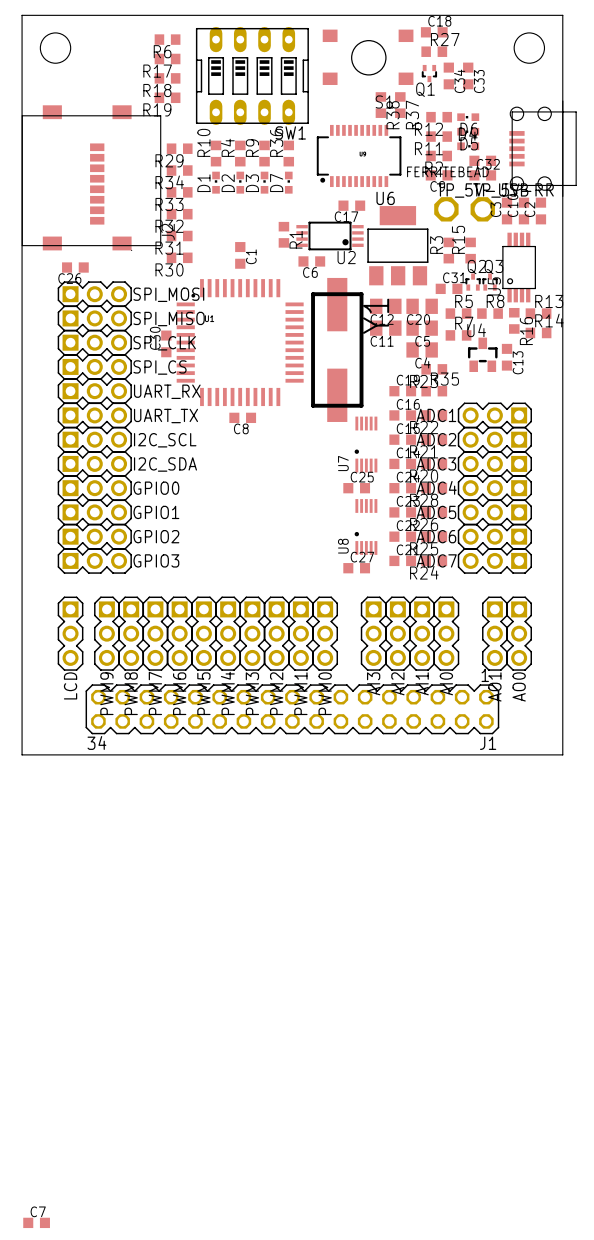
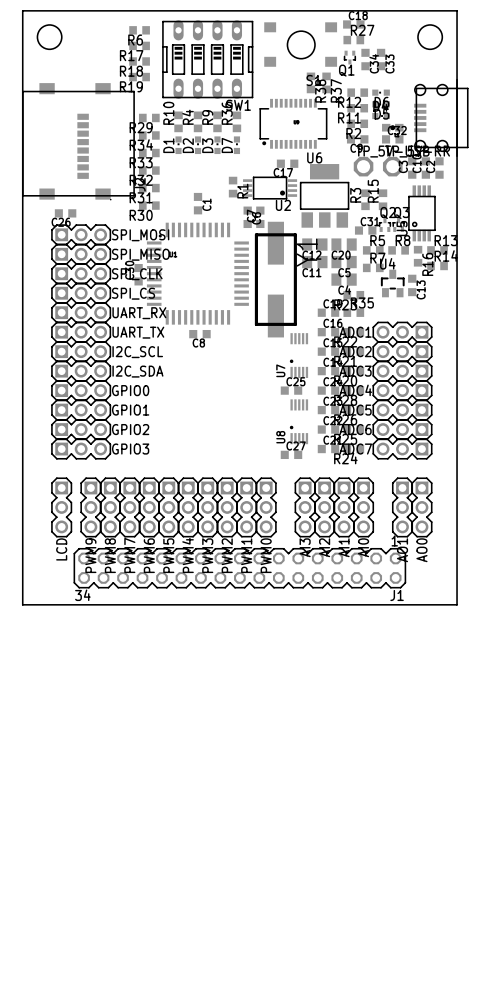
FERRITEBEAD: (482, 160) -> none
part: none -> (392, 127)
C6 rotation: 0° (311, 261) -> 90° clockwise (247, 217)
C7 rotation: 0° (36, 1222) -> 90° clockwise (260, 217)
C7 position: (36, 1222) -> (260, 217)

